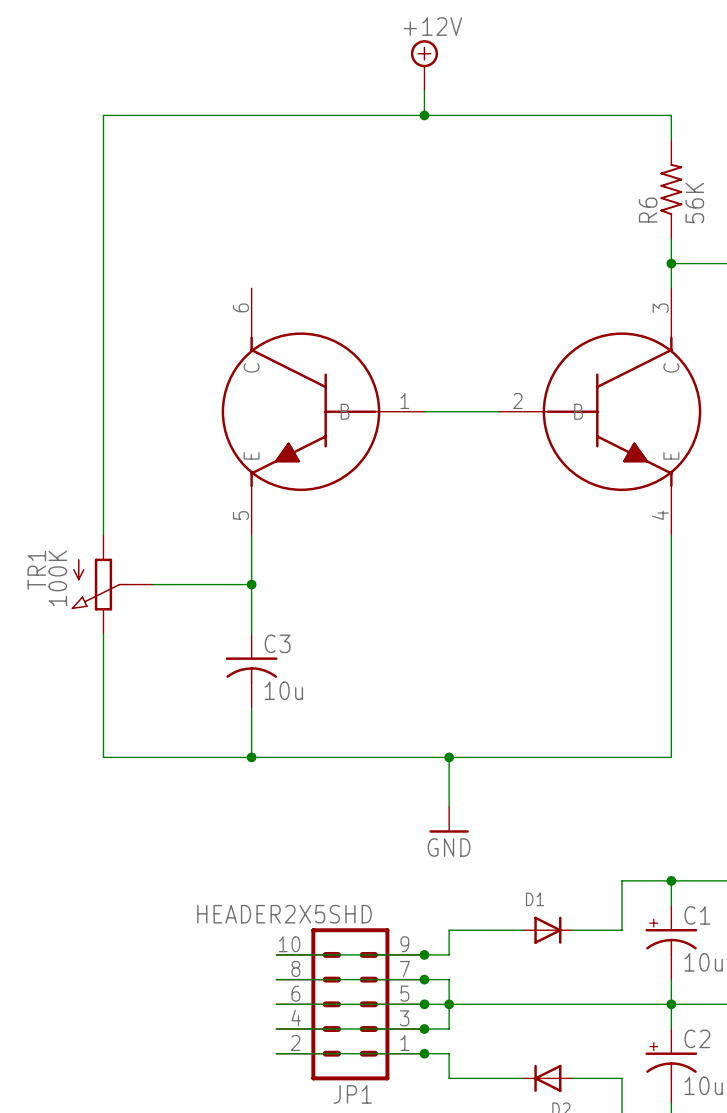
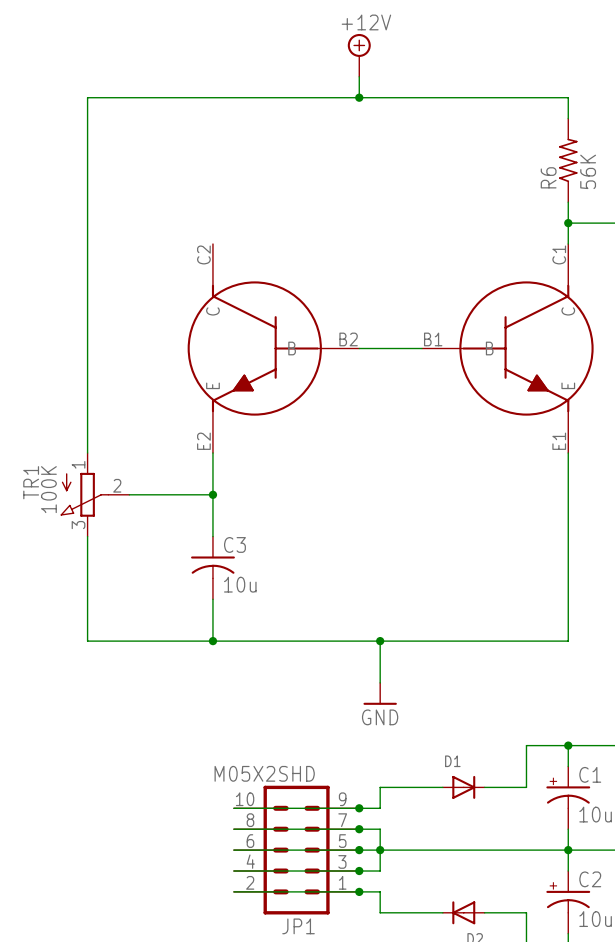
part pin number: 6 (240, 307) -> C2 (203, 254)
part pin number: 3 (660, 308) -> C1 (559, 254)
part pin number: 1 (404, 401) -> B2 (348, 339)
part pin number: 2 (517, 401) -> B1 (433, 339)
part pin number: 5 (240, 515) -> E2 (203, 441)
part pin number: 4 (660, 515) -> E1 (559, 441)
TR1 pin number: none -> 1 (78, 464)
TR1 pin number: none -> 2 (117, 485)
TR1 pin number: none -> 3 (78, 525)
JP1 value: HEADER2X5SHD (284, 914) -> M05X2SHD (264, 773)

